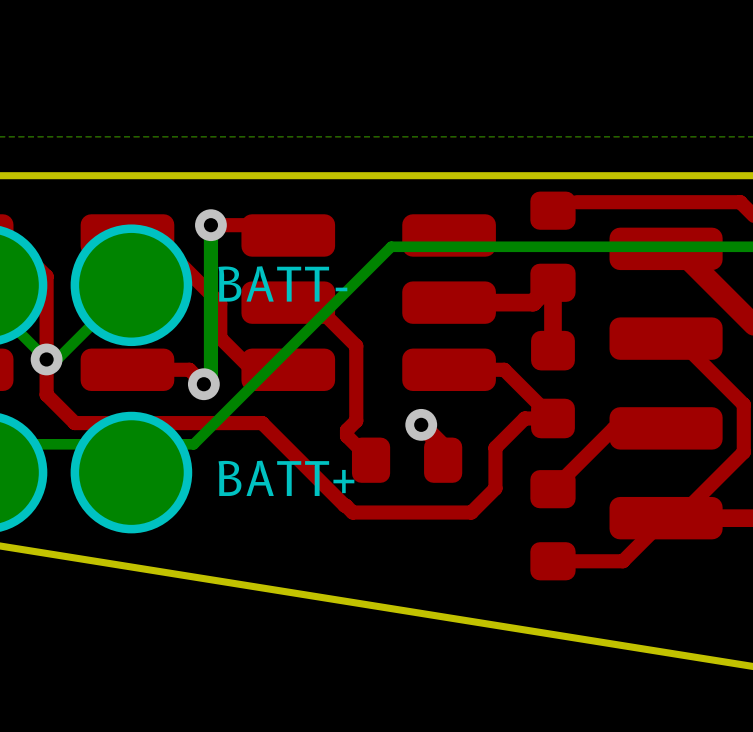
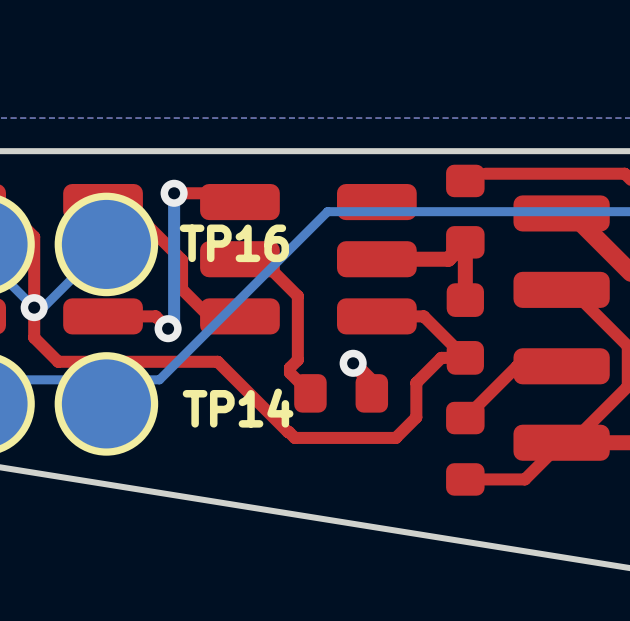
BATT- name: BATT- (282, 283) -> TP16 (234, 243)
BATT+ name: BATT+ (286, 478) -> TP14 (238, 408)

